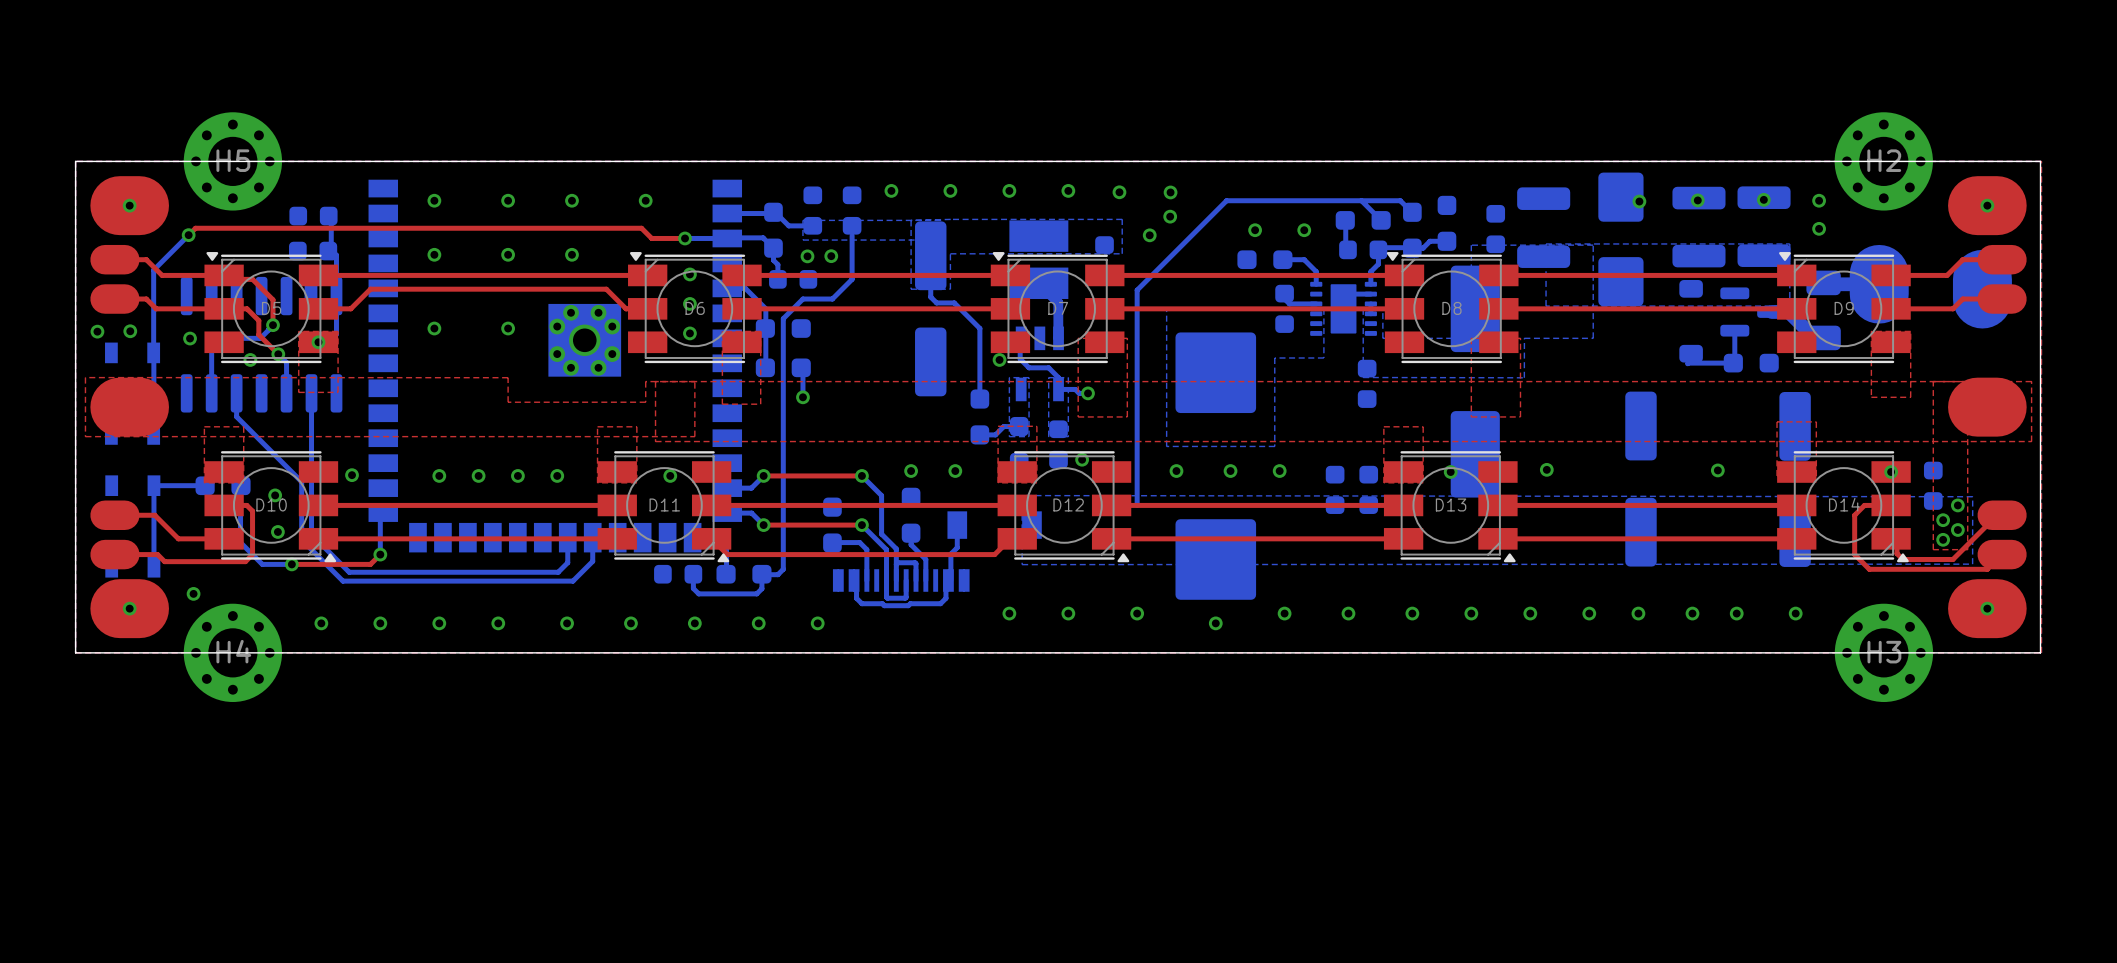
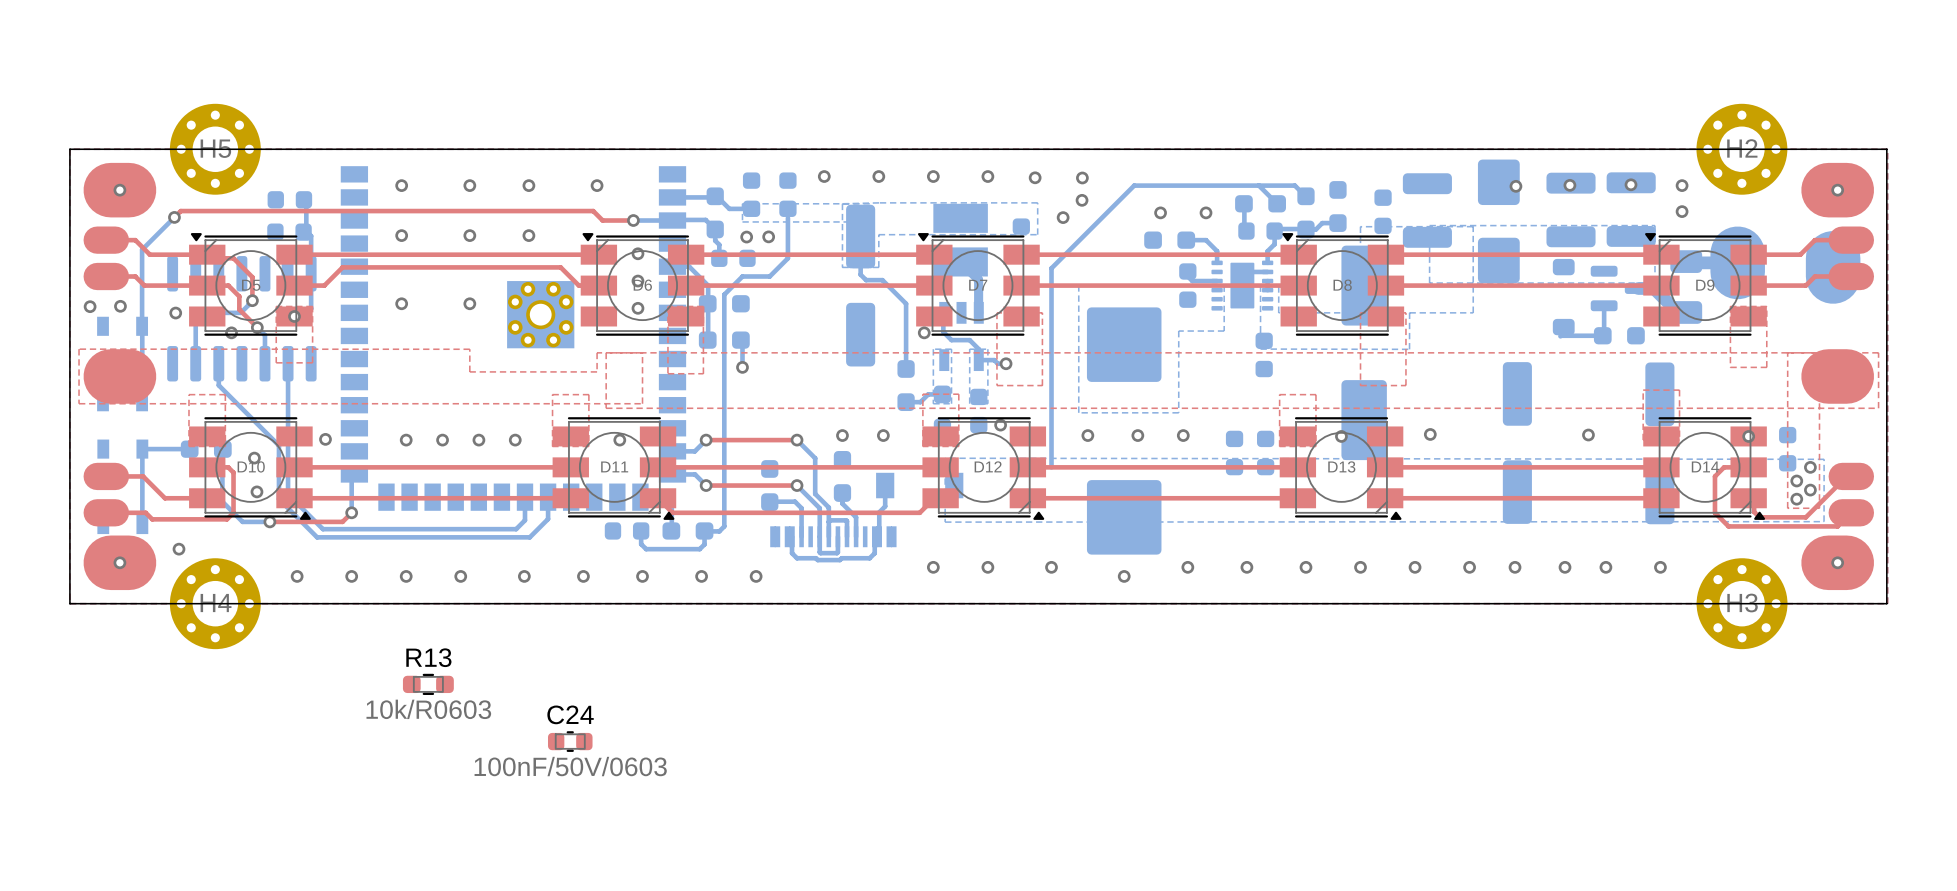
R13: none -> 10k/R0603 (428, 684)
C24: none -> 100nF/50V/0603 (570, 741)

